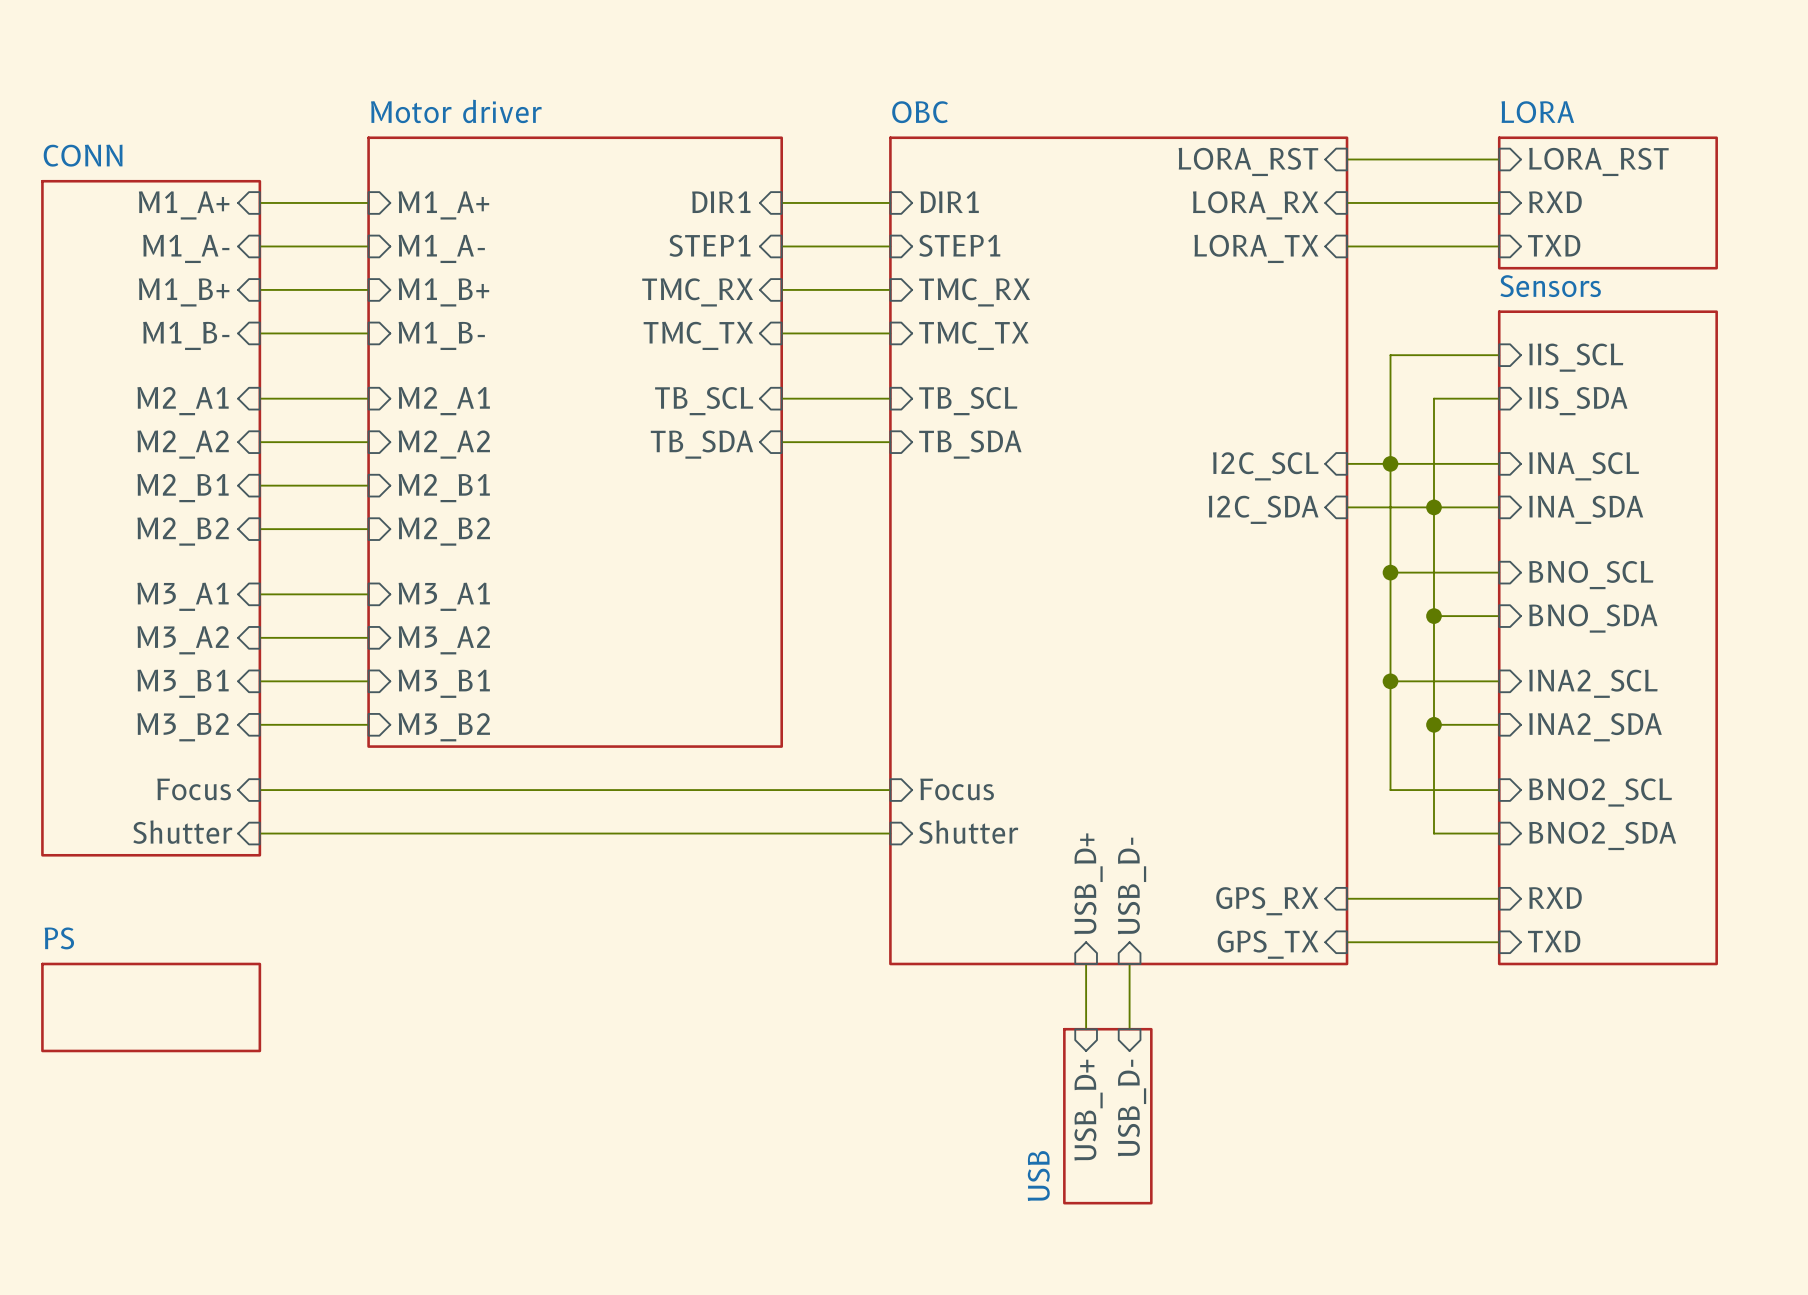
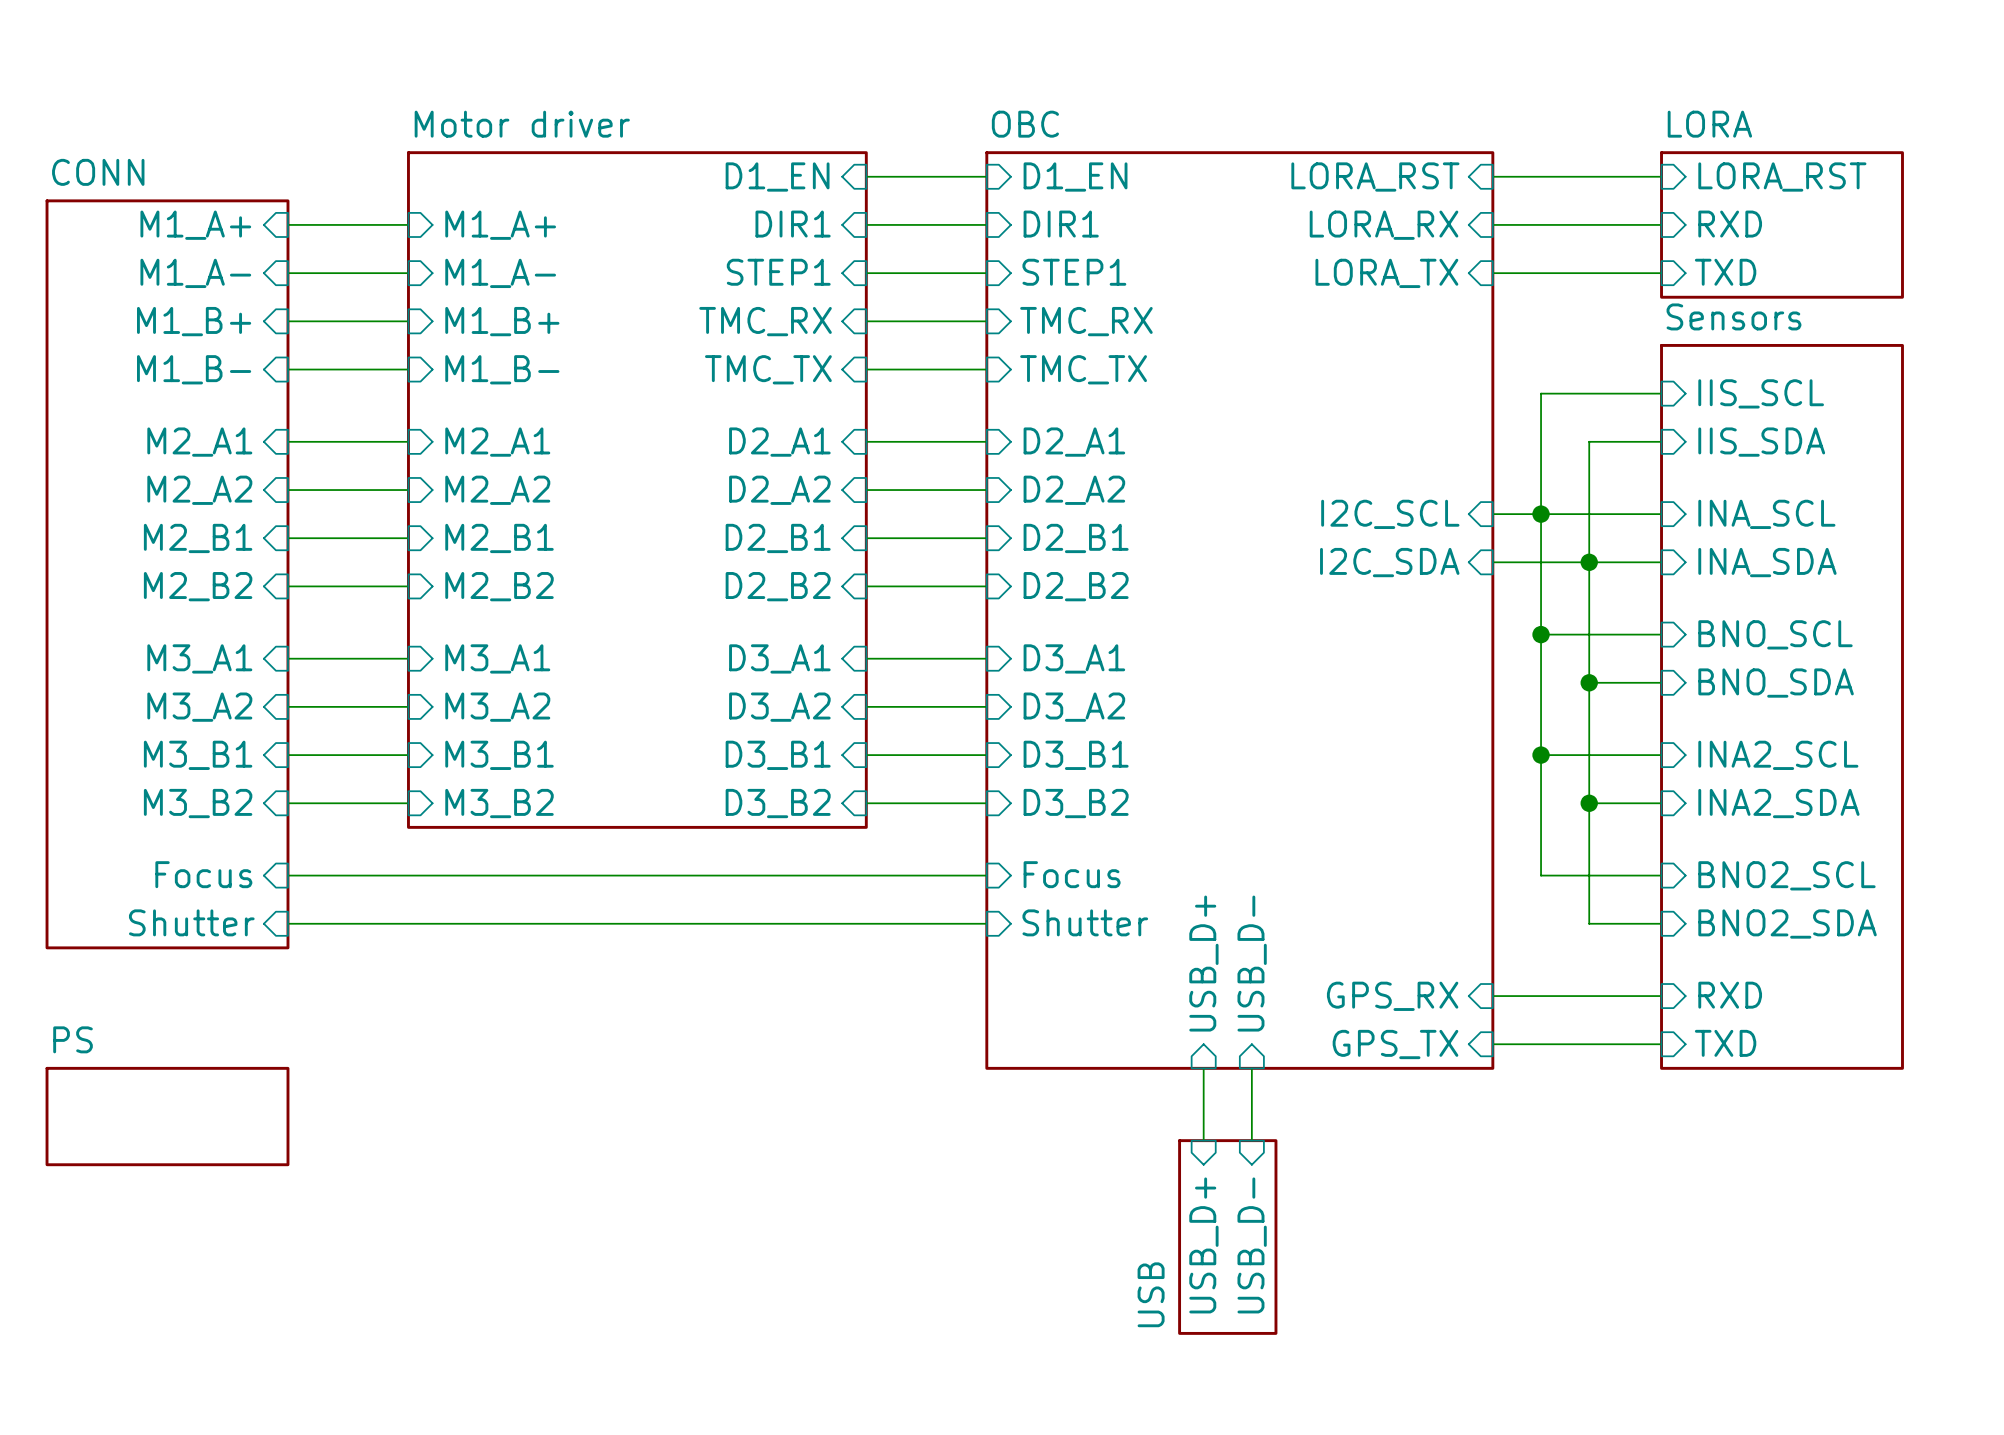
wire: none -> (866, 176) (986, 176)
sheet pin: none -> D1_EN (777, 177)
sheet pin: none -> D1_EN (1075, 177)
sheet pin: TB_SCL (704, 401) -> D2_A1 (779, 442)
sheet pin: TB_SCL (968, 401) -> D2_A1 (1074, 442)
sheet pin: TB_SDA (701, 444) -> D2_A2 (779, 490)
sheet pin: TB_SDA (970, 444) -> D2_A2 (1074, 490)
wire: none -> (866, 538) (986, 538)
sheet pin: none -> D2_B1 (778, 538)
sheet pin: none -> D2_B1 (1076, 538)
wire: none -> (866, 586) (986, 586)
sheet pin: none -> D2_B2 (778, 586)
sheet pin: none -> D2_B2 (1076, 586)
wire: none -> (866, 658) (986, 658)
sheet pin: none -> D3_A1 (779, 658)
sheet pin: none -> D3_A1 (1074, 658)
wire: none -> (866, 706) (986, 706)
sheet pin: none -> D3_A2 (779, 707)
sheet pin: none -> D3_A2 (1074, 707)
wire: none -> (866, 755) (986, 755)
sheet pin: none -> D3_B1 (778, 755)
sheet pin: none -> D3_B1 (1076, 755)
wire: none -> (866, 803) (986, 803)
sheet pin: none -> D3_B2 (778, 803)
sheet pin: none -> D3_B2 (1076, 803)

